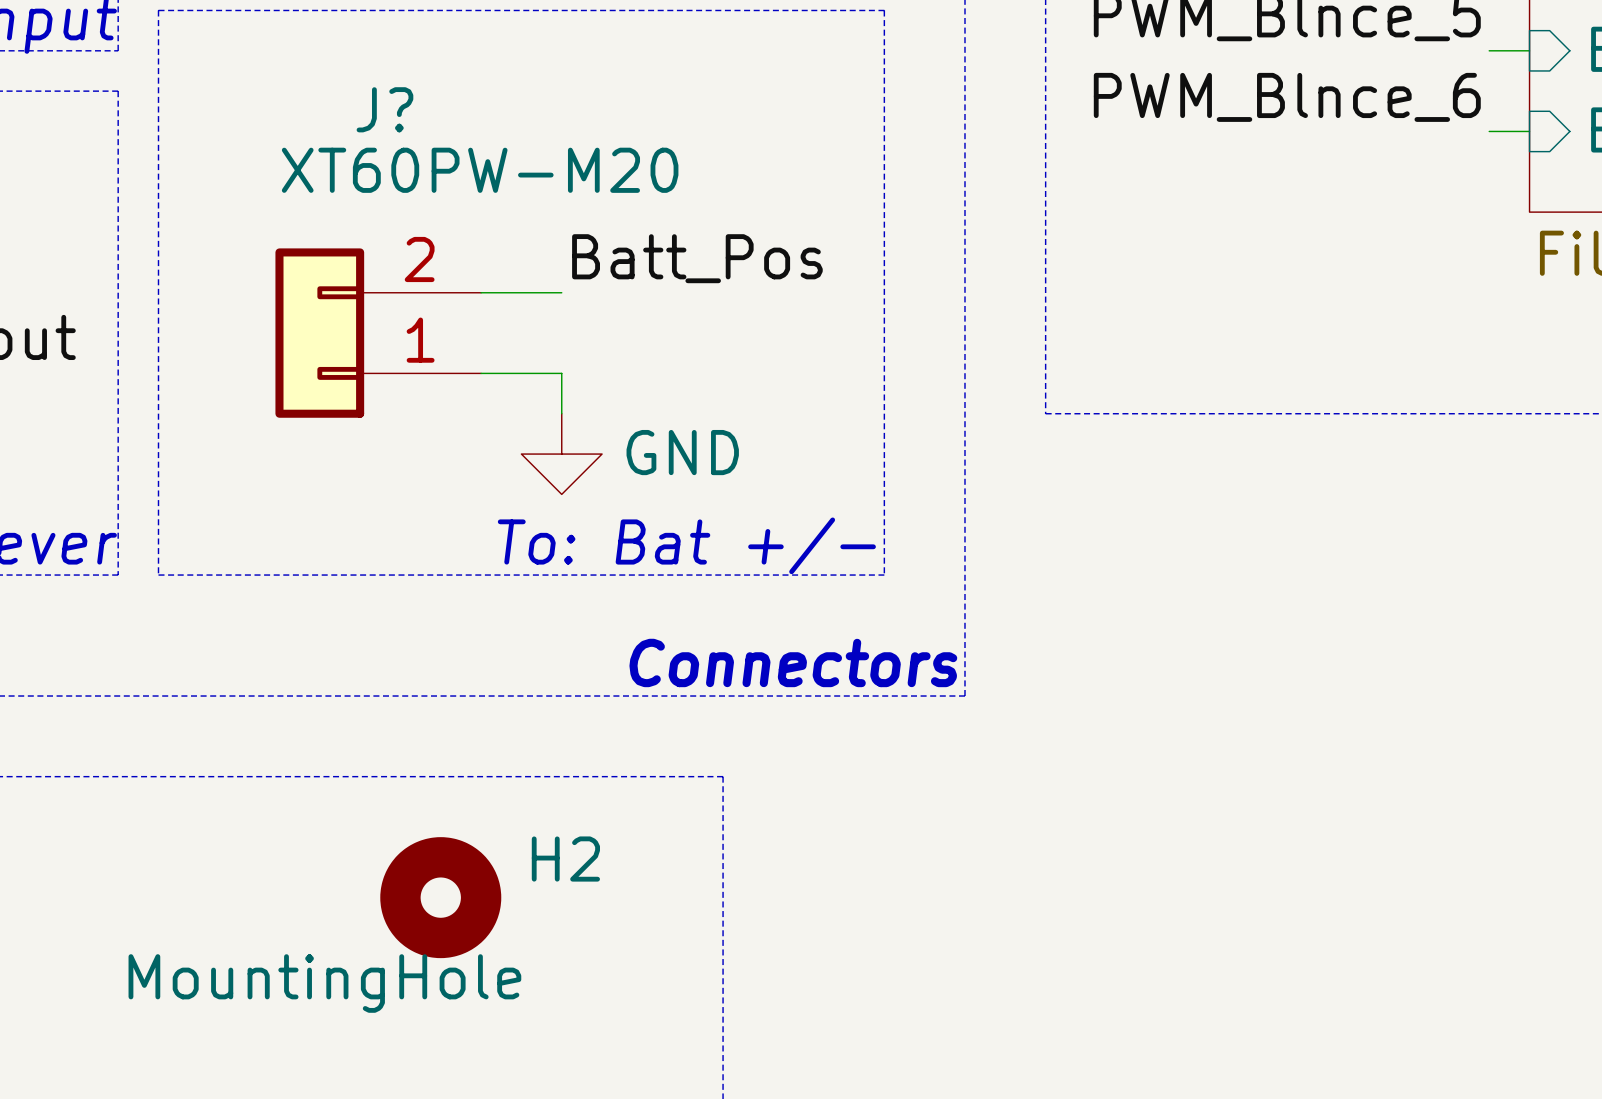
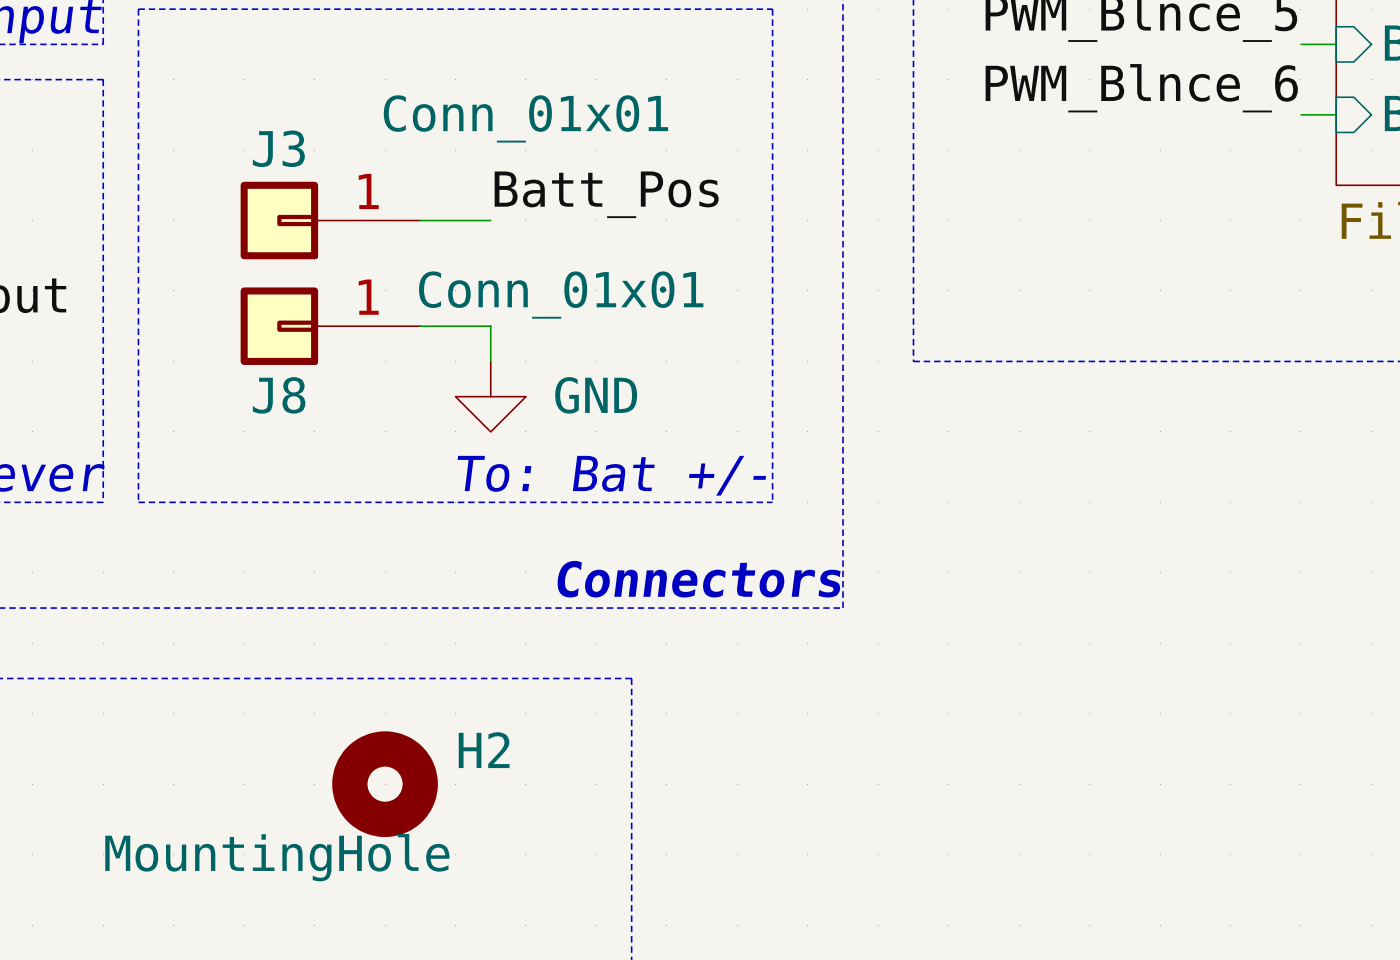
J3: none -> Conn_01x01 (330, 220)
label position: Batt_Pos (697, 258) -> Batt_Pos (606, 194)
wire: (481, 292) (561, 292) -> (420, 220) (490, 220)
J?: XT60PW-M20 (378, 333) -> none
J8: none -> Conn_01x01 (330, 326)

